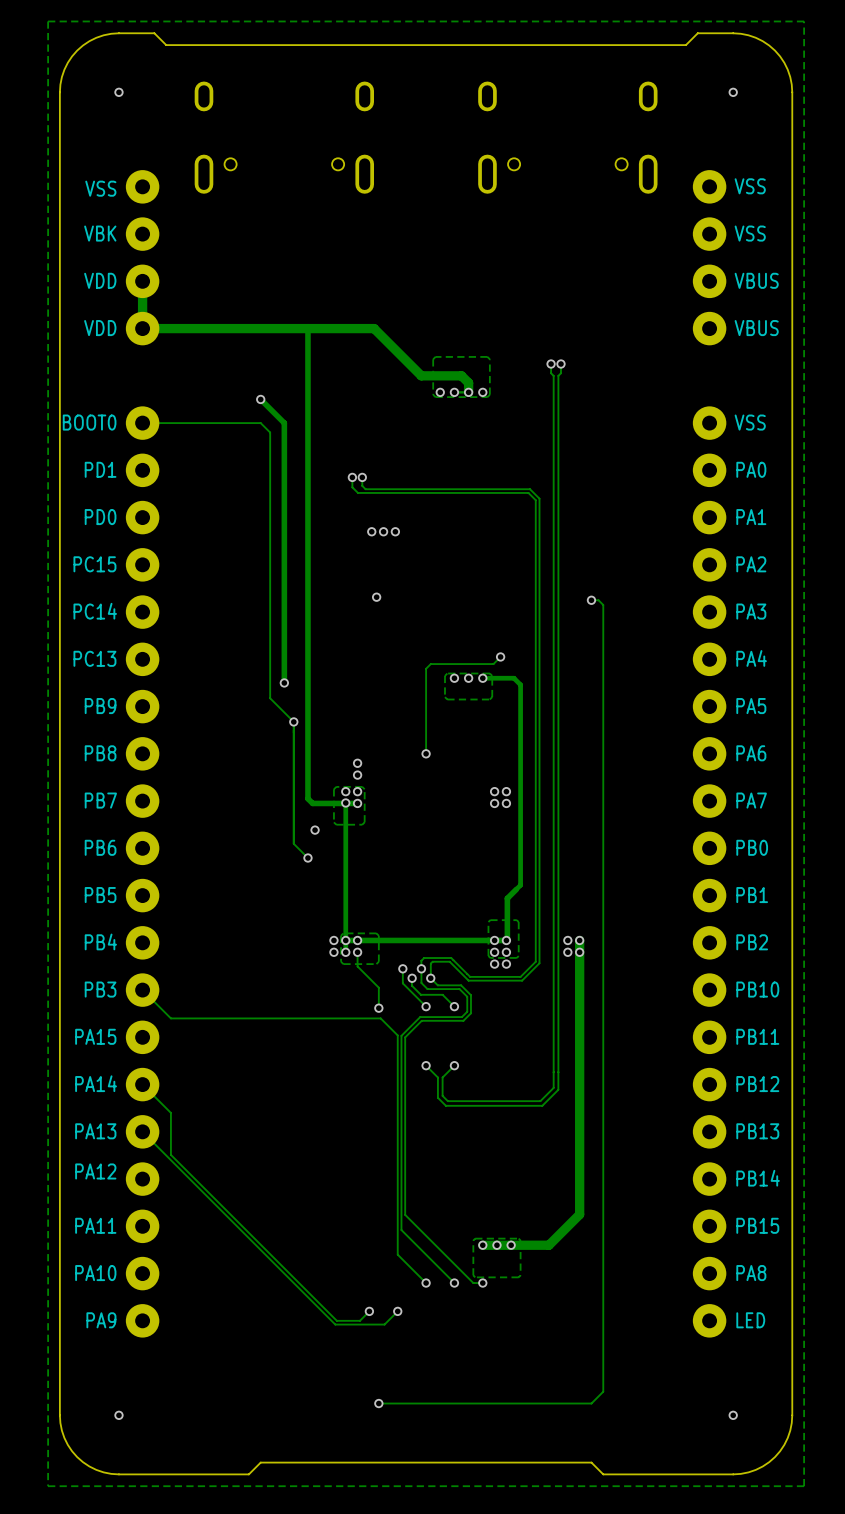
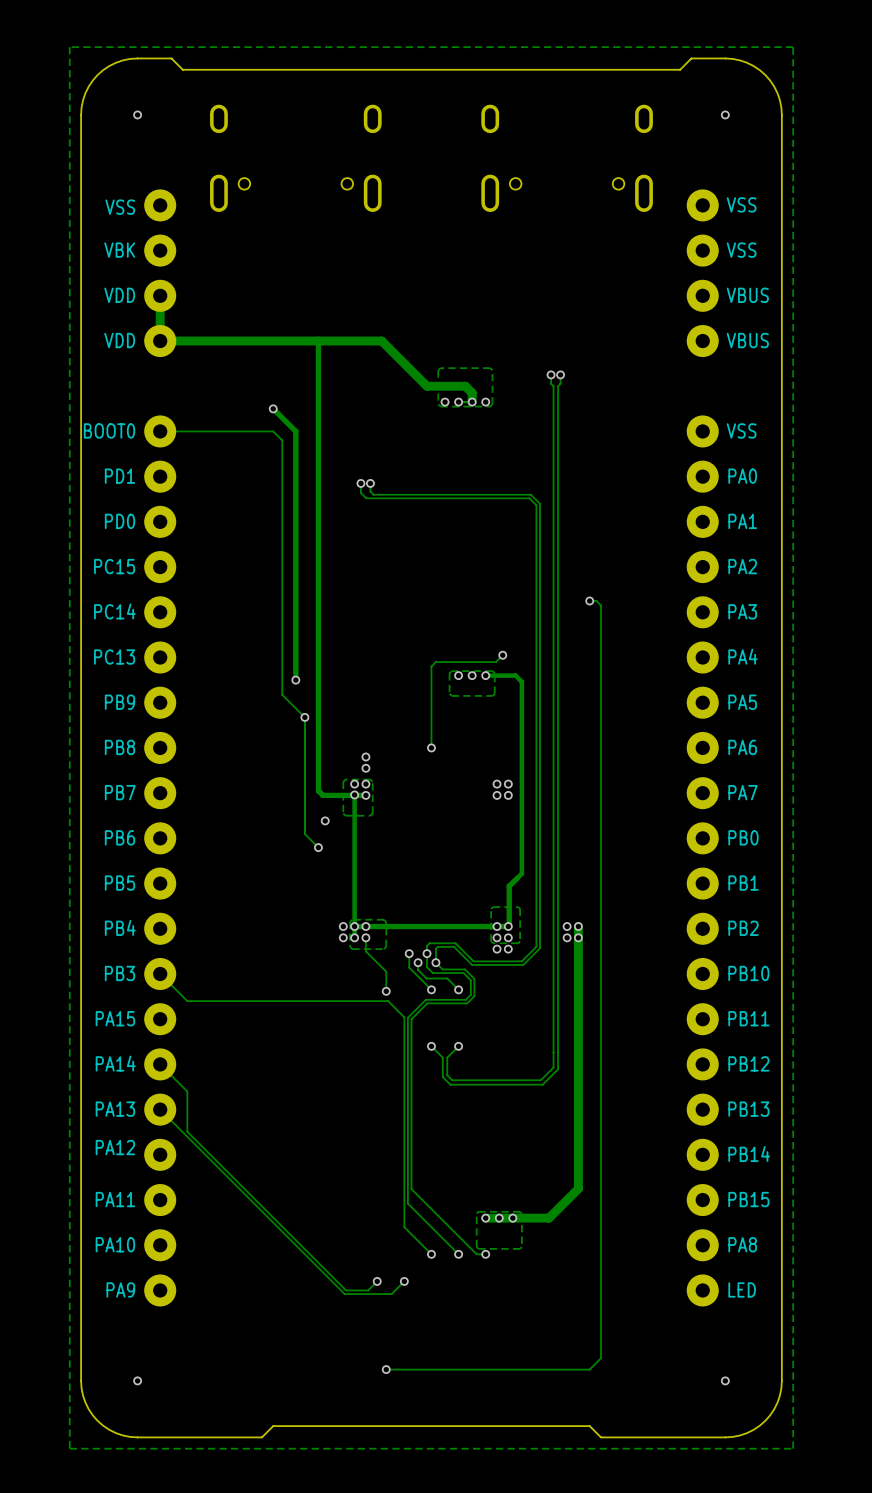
via: (371, 531) -> none
via: (383, 531) -> none
via: (395, 531) -> none
via: (376, 597) -> none

